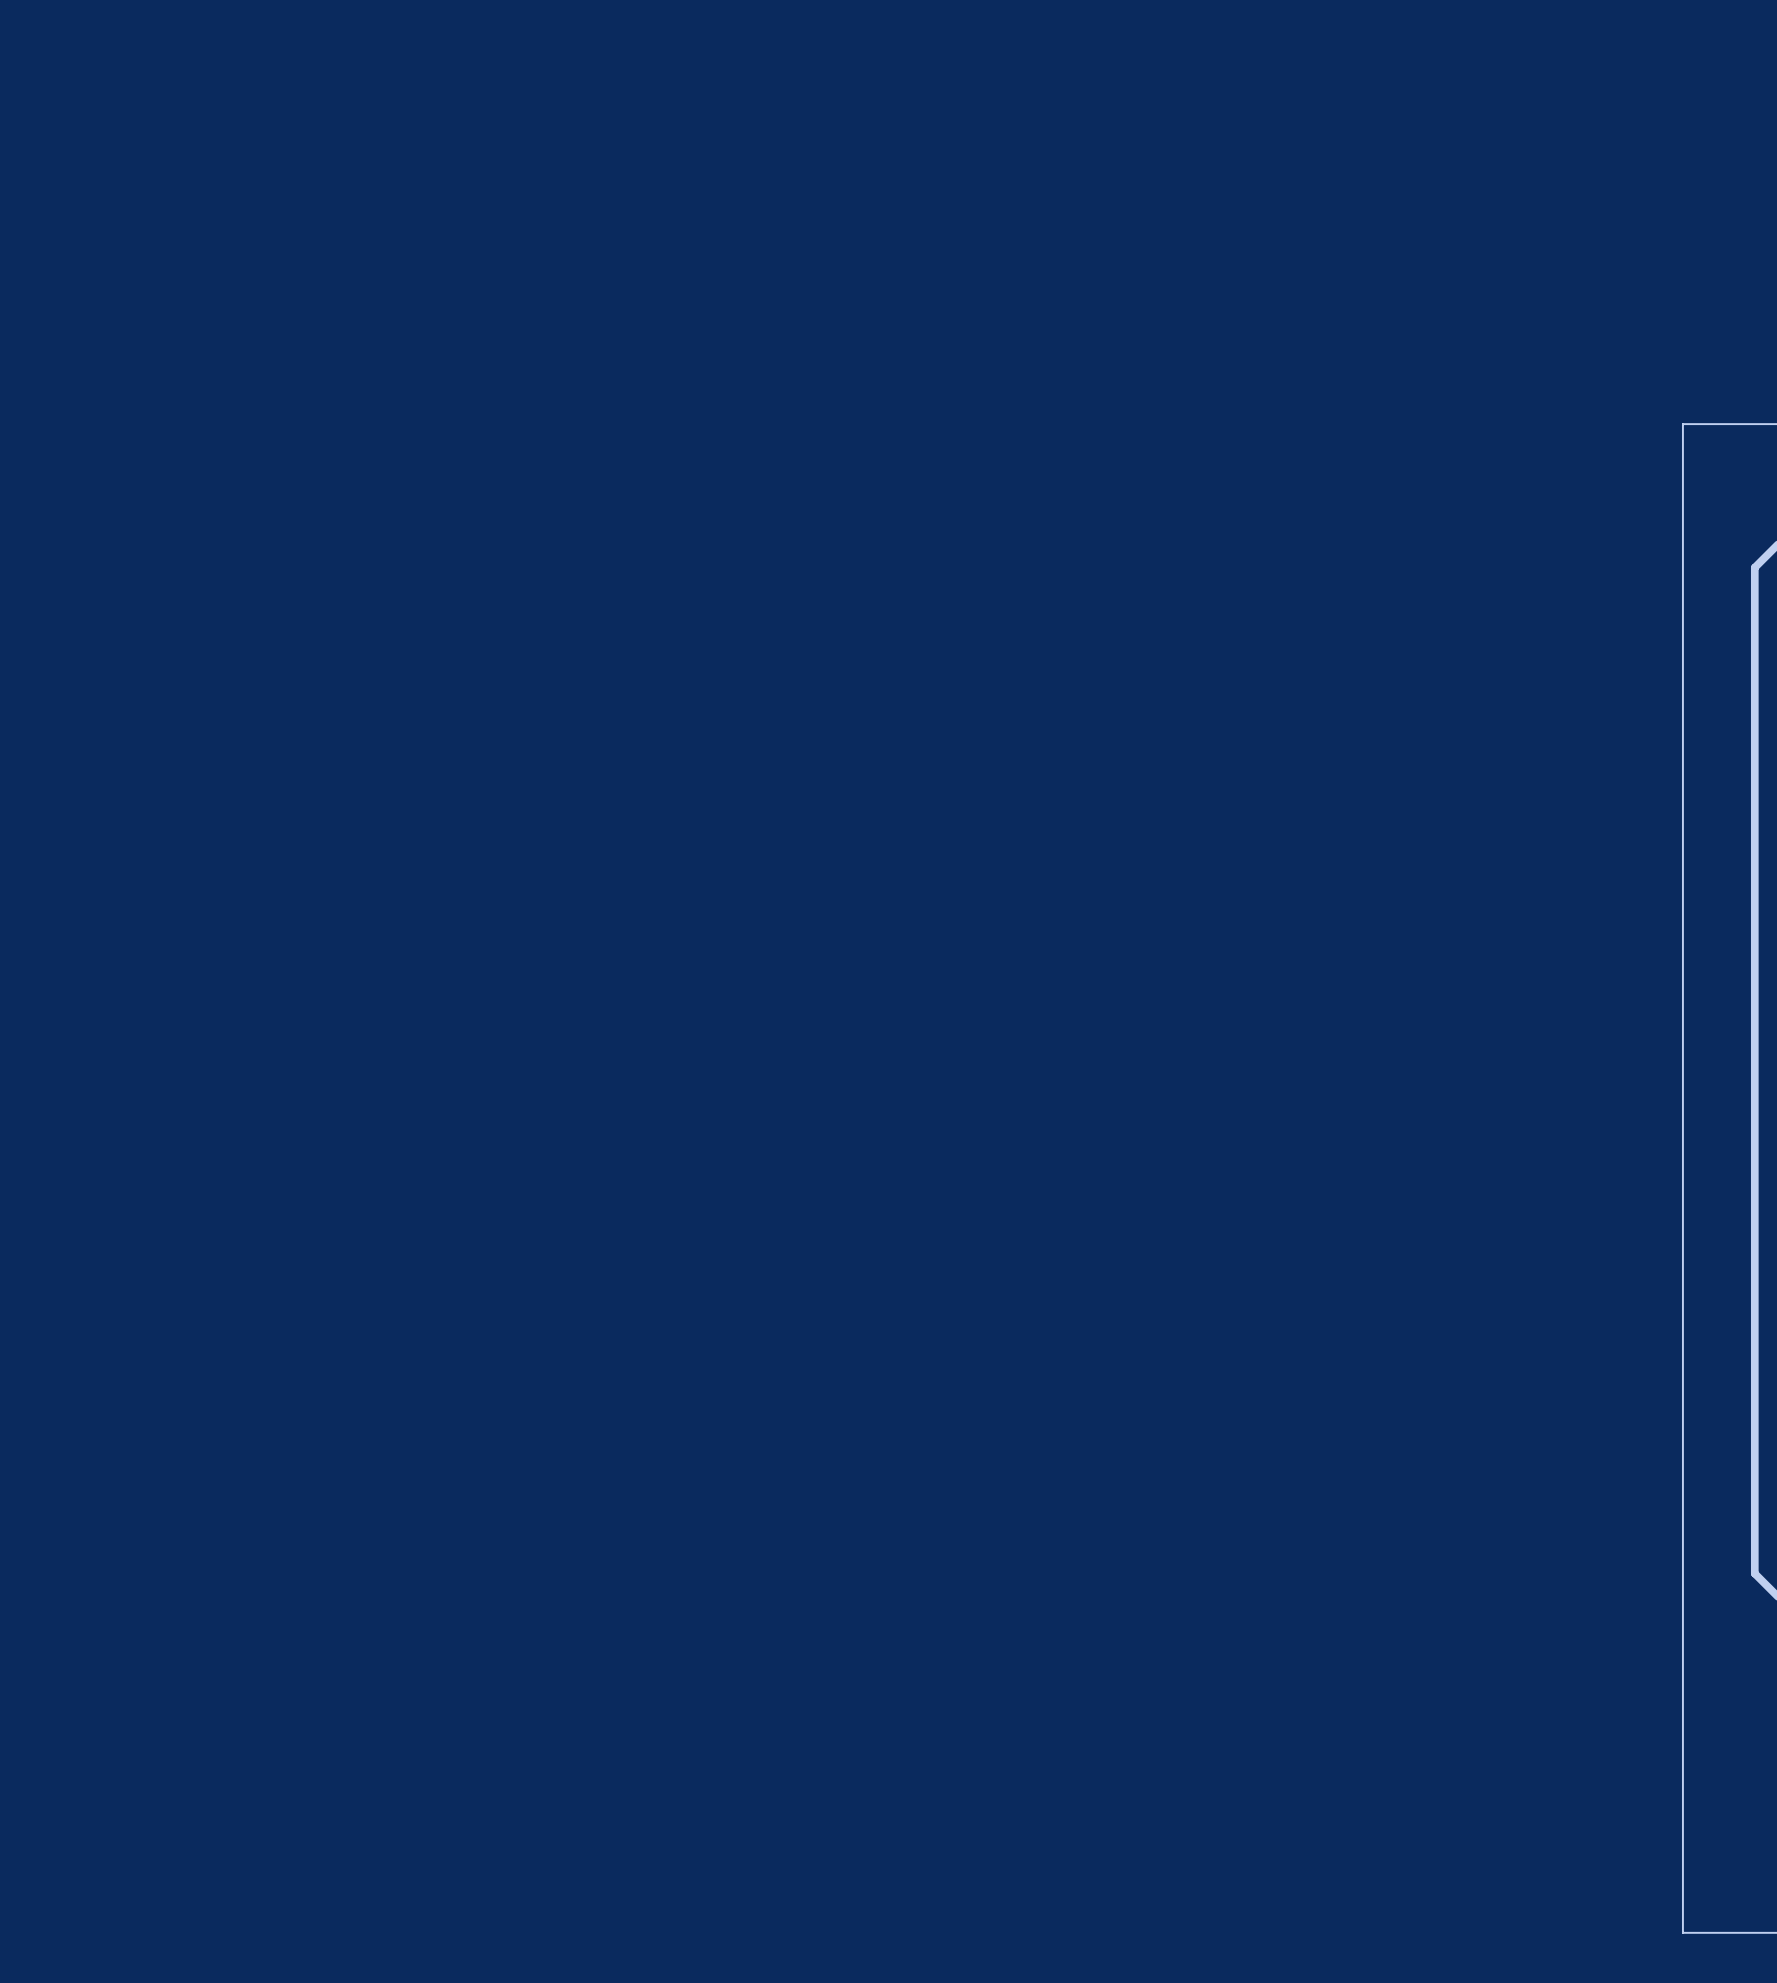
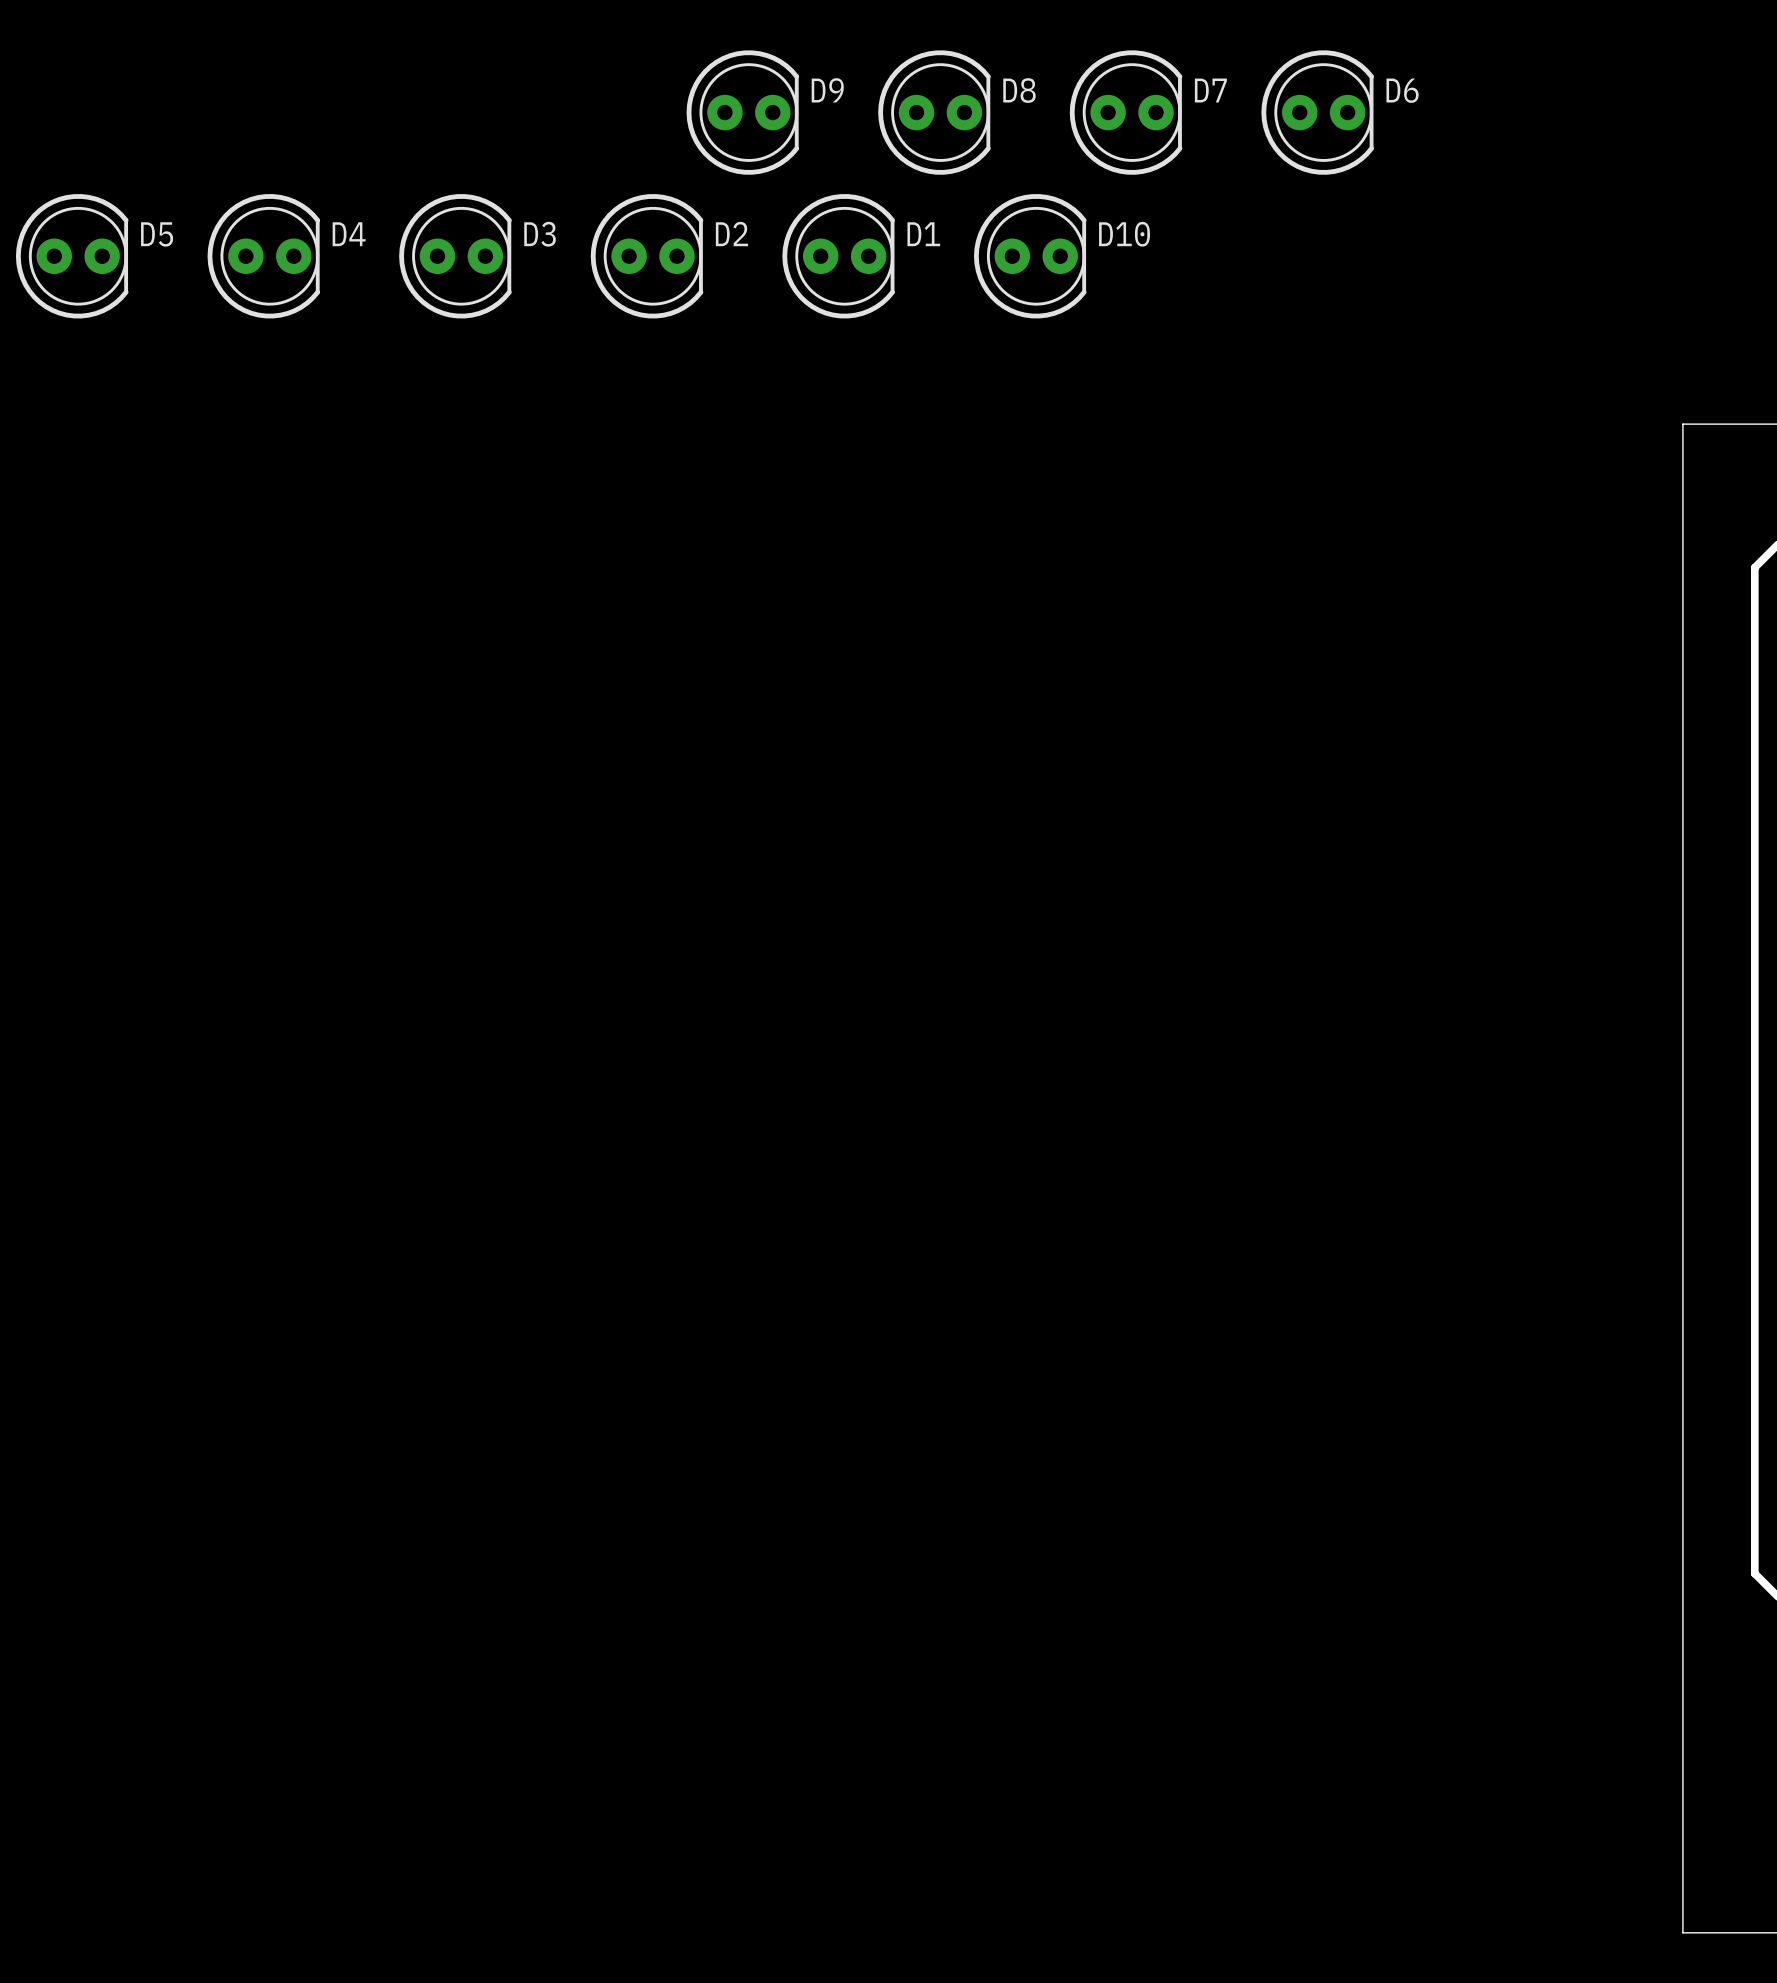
D9: none -> (742, 112)
D8: none -> (934, 112)
D7: none -> (1126, 112)
D6: none -> (1317, 112)
D5: none -> (72, 256)
D4: none -> (263, 256)
D3: none -> (455, 256)
D2: none -> (647, 256)
D1: none -> (838, 256)
D10: none -> (1030, 256)

